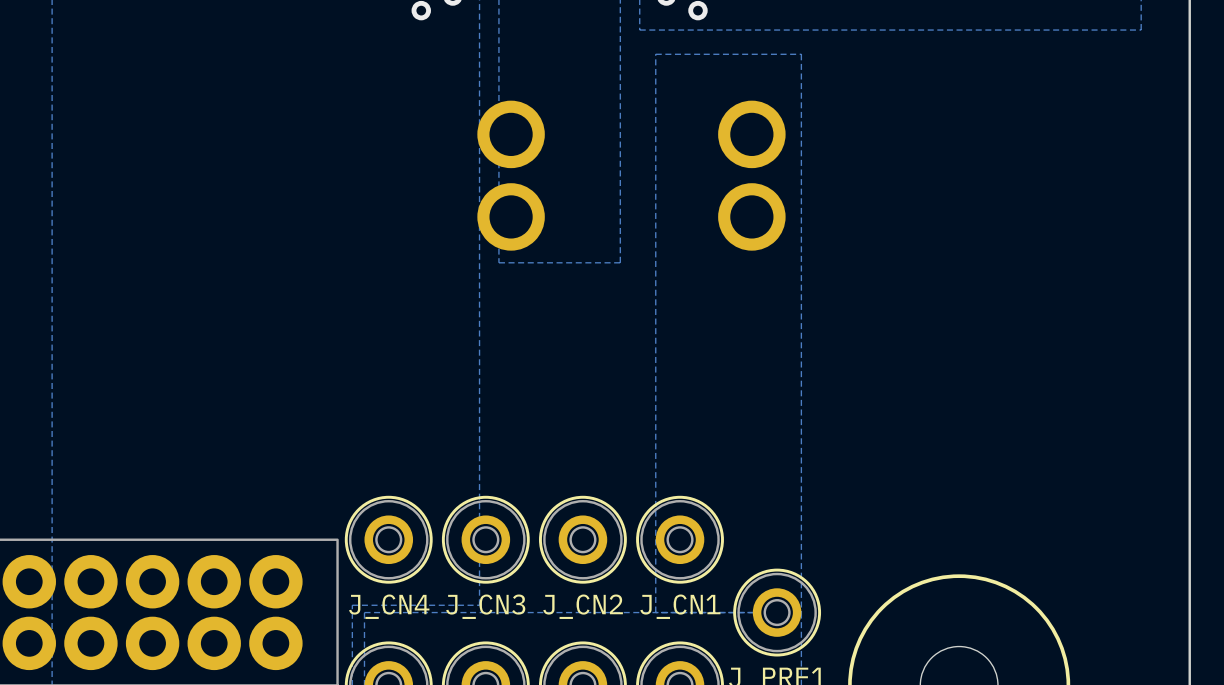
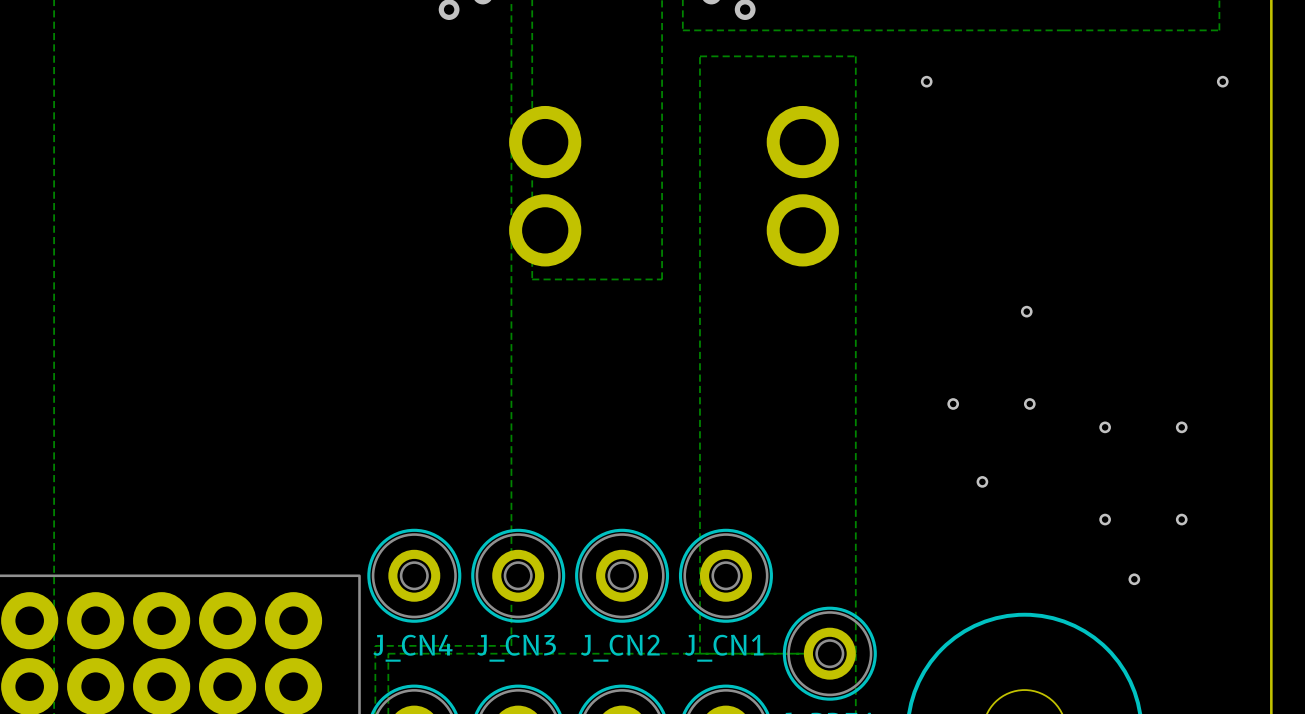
via: none -> (926, 81)
via: none -> (1222, 81)
via: none -> (1026, 311)
via: none -> (953, 403)
via: none -> (1029, 403)
via: none -> (1105, 427)
via: none -> (1181, 427)
via: none -> (982, 481)
via: none -> (1105, 519)
via: none -> (1181, 519)
via: none -> (1134, 579)

